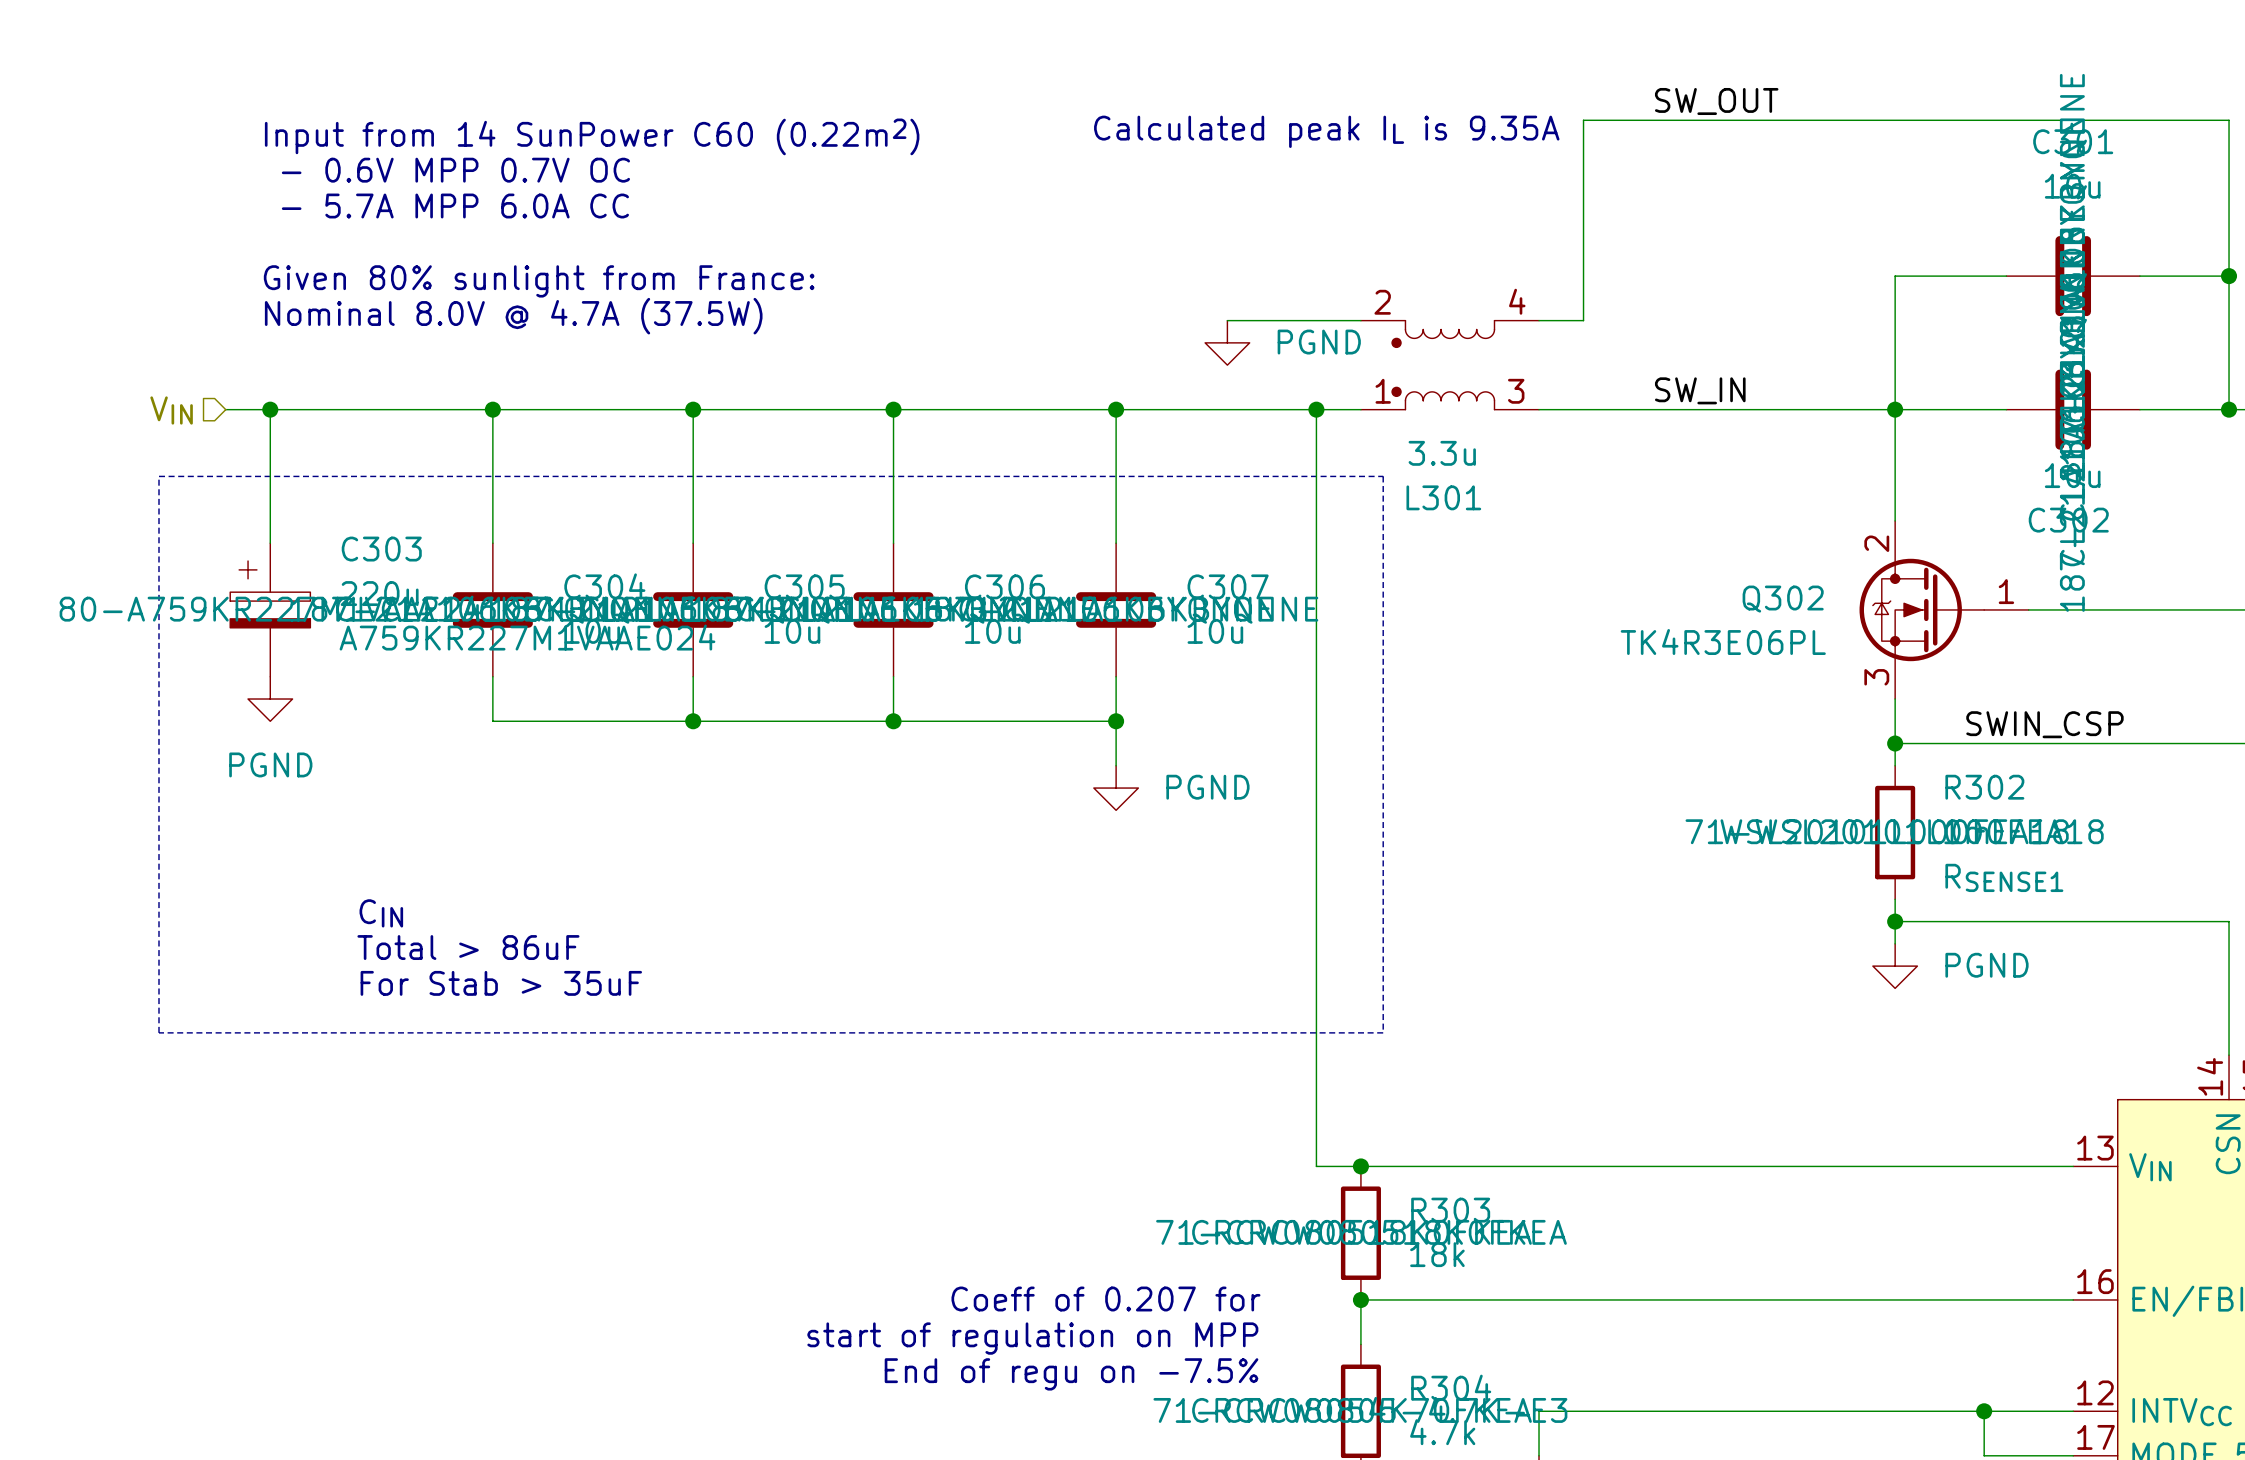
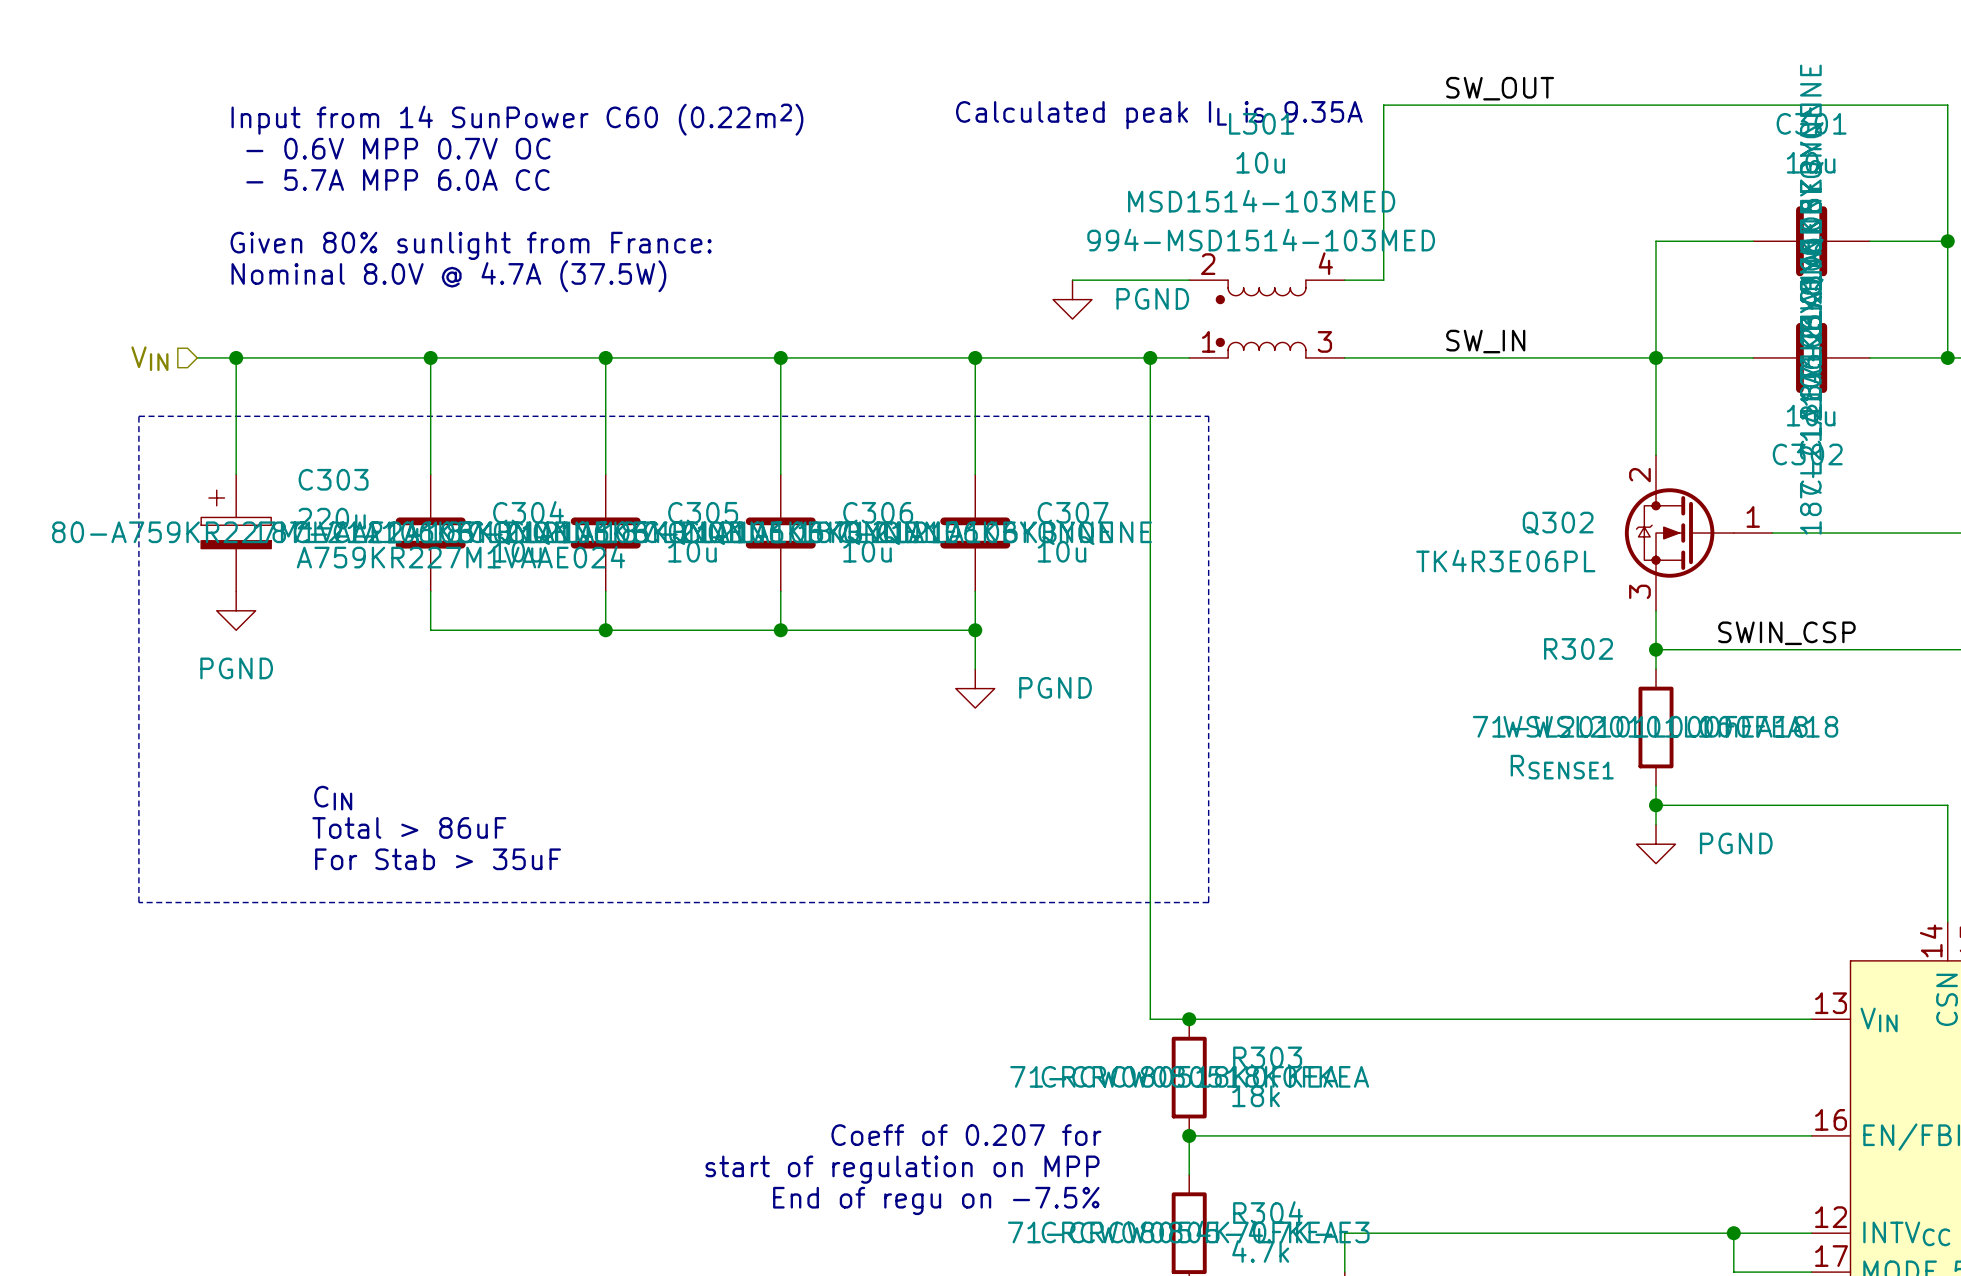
L301 text: none -> MSD1514-103MED (1261, 201)
L301 text: none -> 994-MSD1514-103MED (1261, 240)
L301 value: 3.3u (1442, 453) -> 10u (1260, 162)
L301 name position: L301 (1443, 497) -> L301 (1261, 123)
R302 name position: R302 (1984, 787) -> R302 (1578, 648)
R302 text position: RSENSE1 (2004, 877) -> RSENSE1 (1562, 767)

